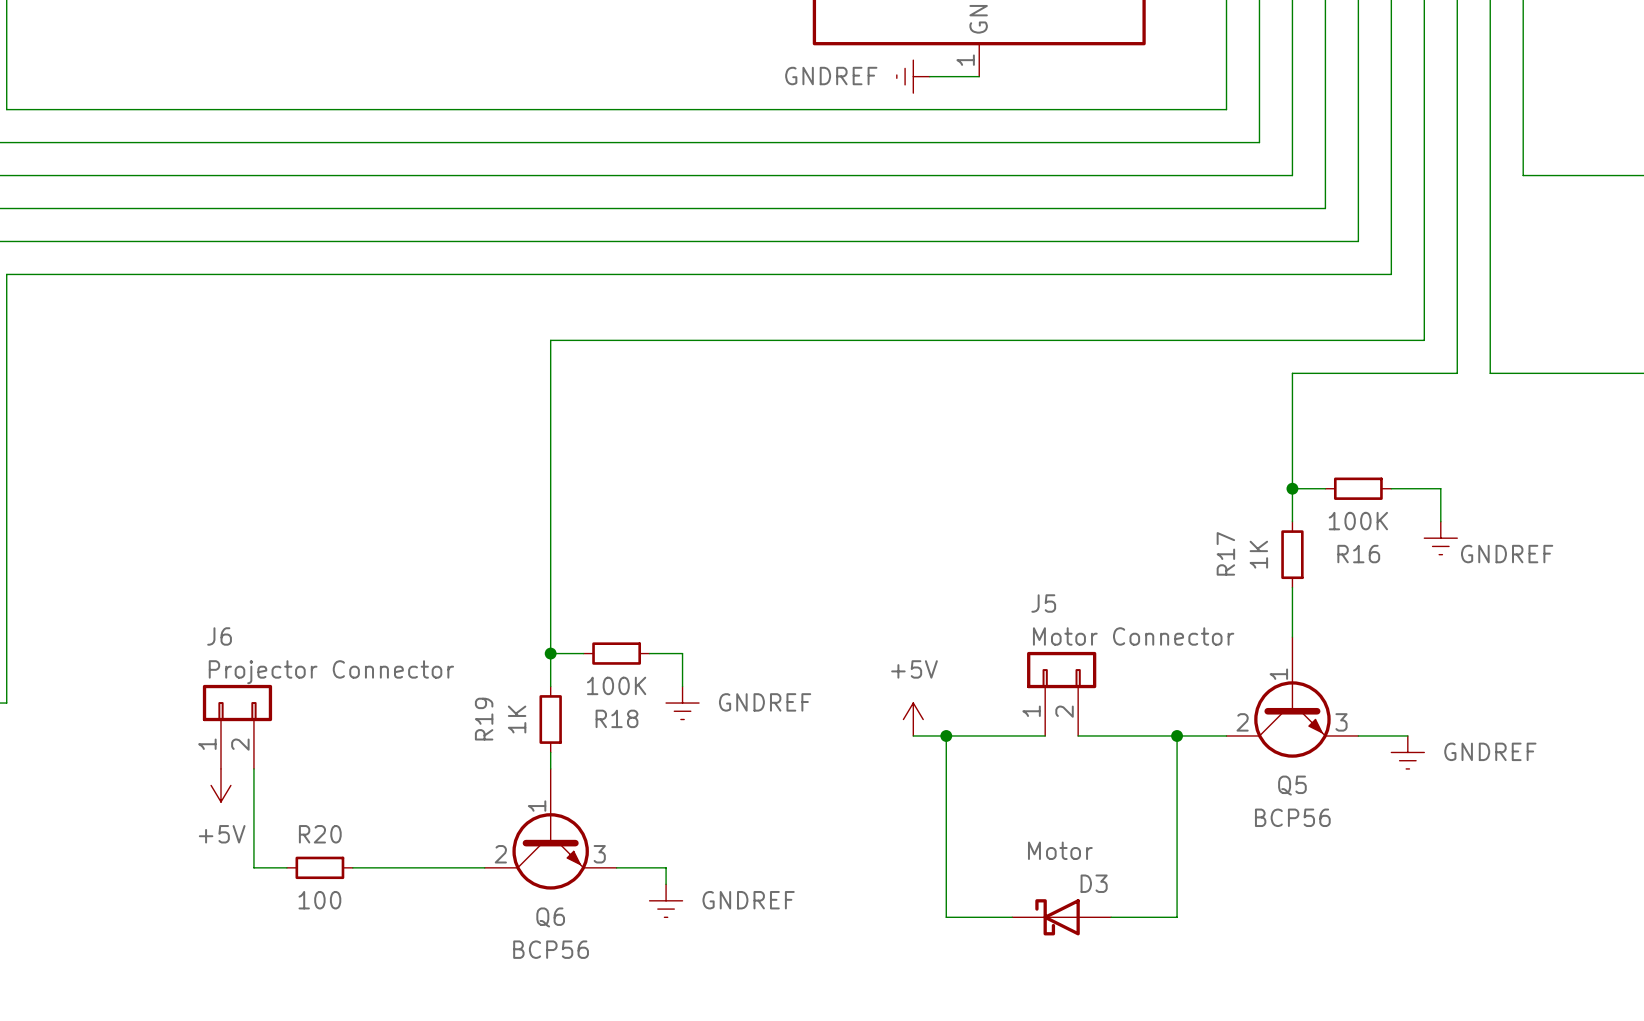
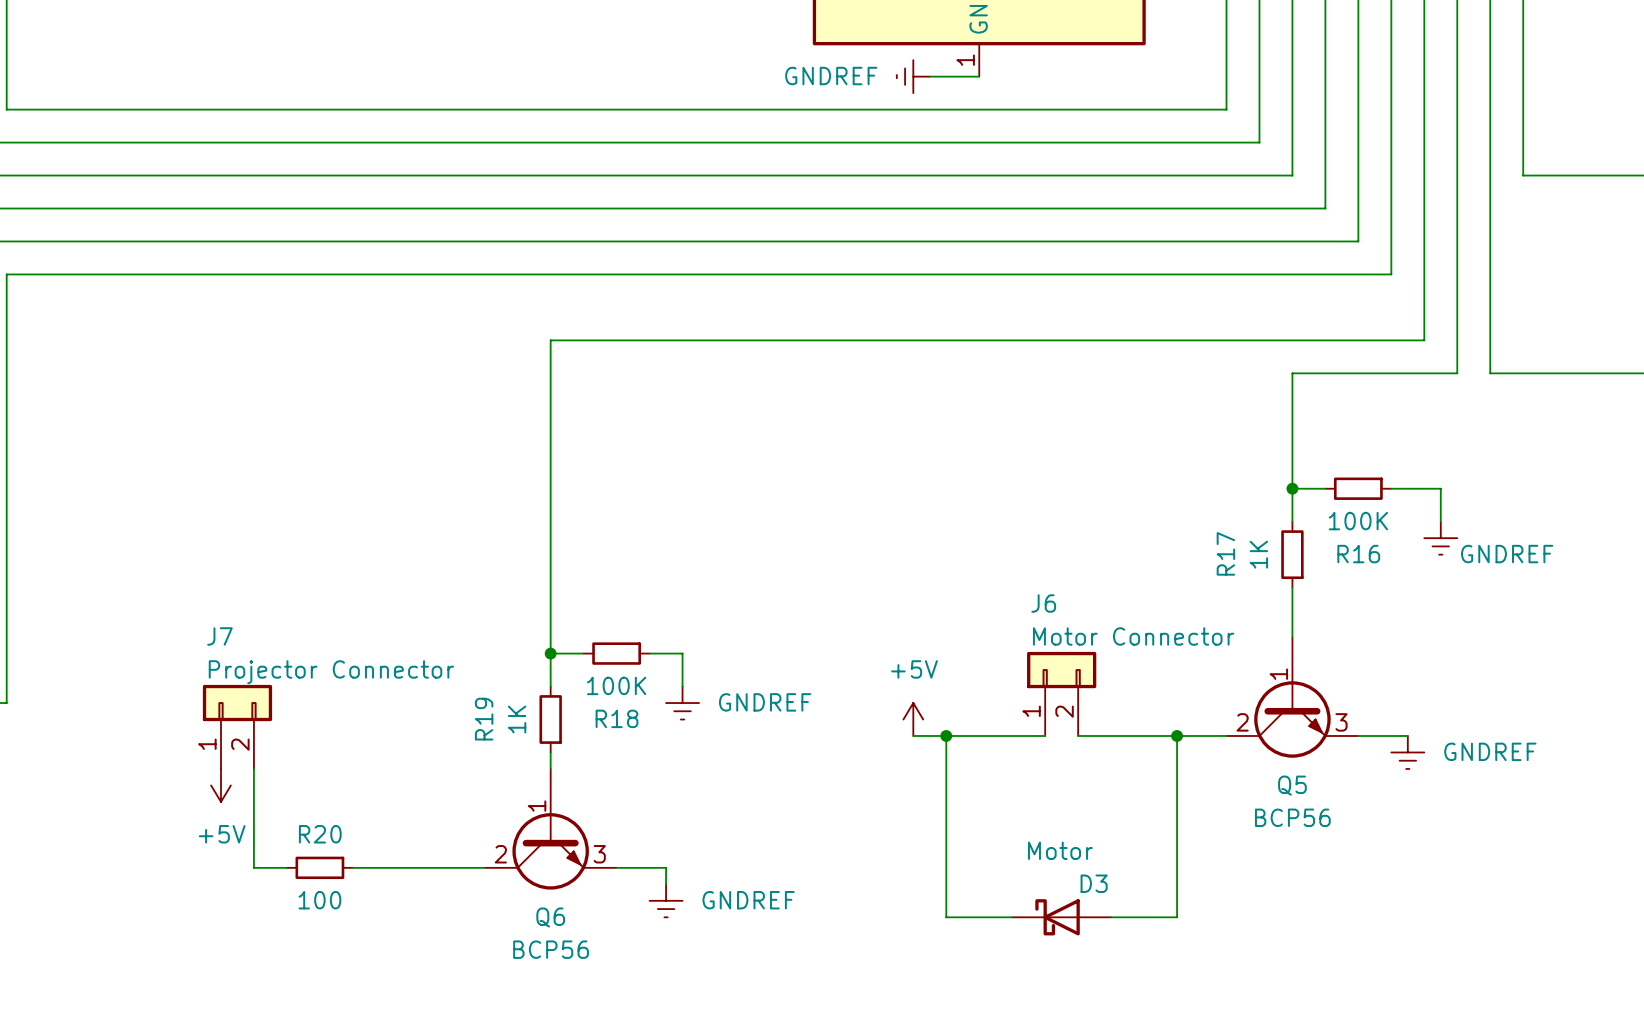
J5 name: J5 (1043, 603) -> J6 (1043, 603)
J6 name: J6 (219, 636) -> J7 (219, 636)

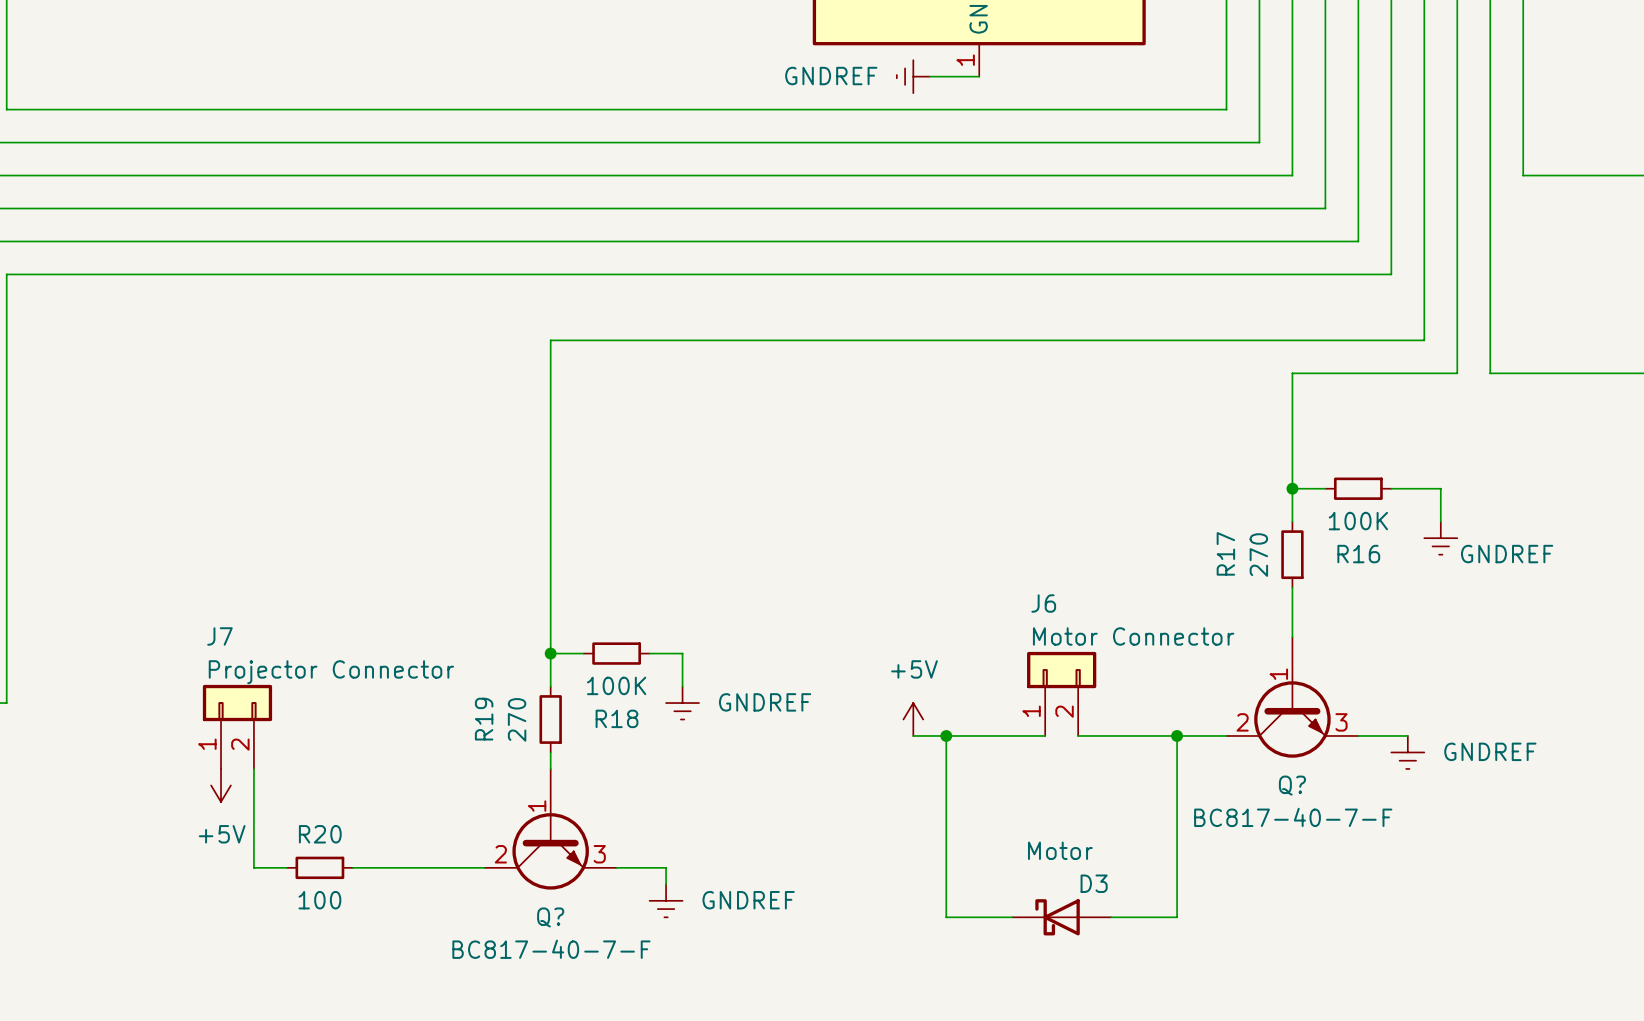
R17 value: 1K (1258, 554) -> 270 (1258, 555)
R19 value: 1K (517, 719) -> 270 (517, 719)
Q5 name: Q5 (1292, 785) -> Q? (1292, 785)
Q5 value: BCP56 (1292, 817) -> BC817-40-7-F (1293, 817)
Q6 name: Q6 (550, 917) -> Q? (550, 917)
Q6 value: BCP56 (551, 949) -> BC817-40-7-F (551, 949)

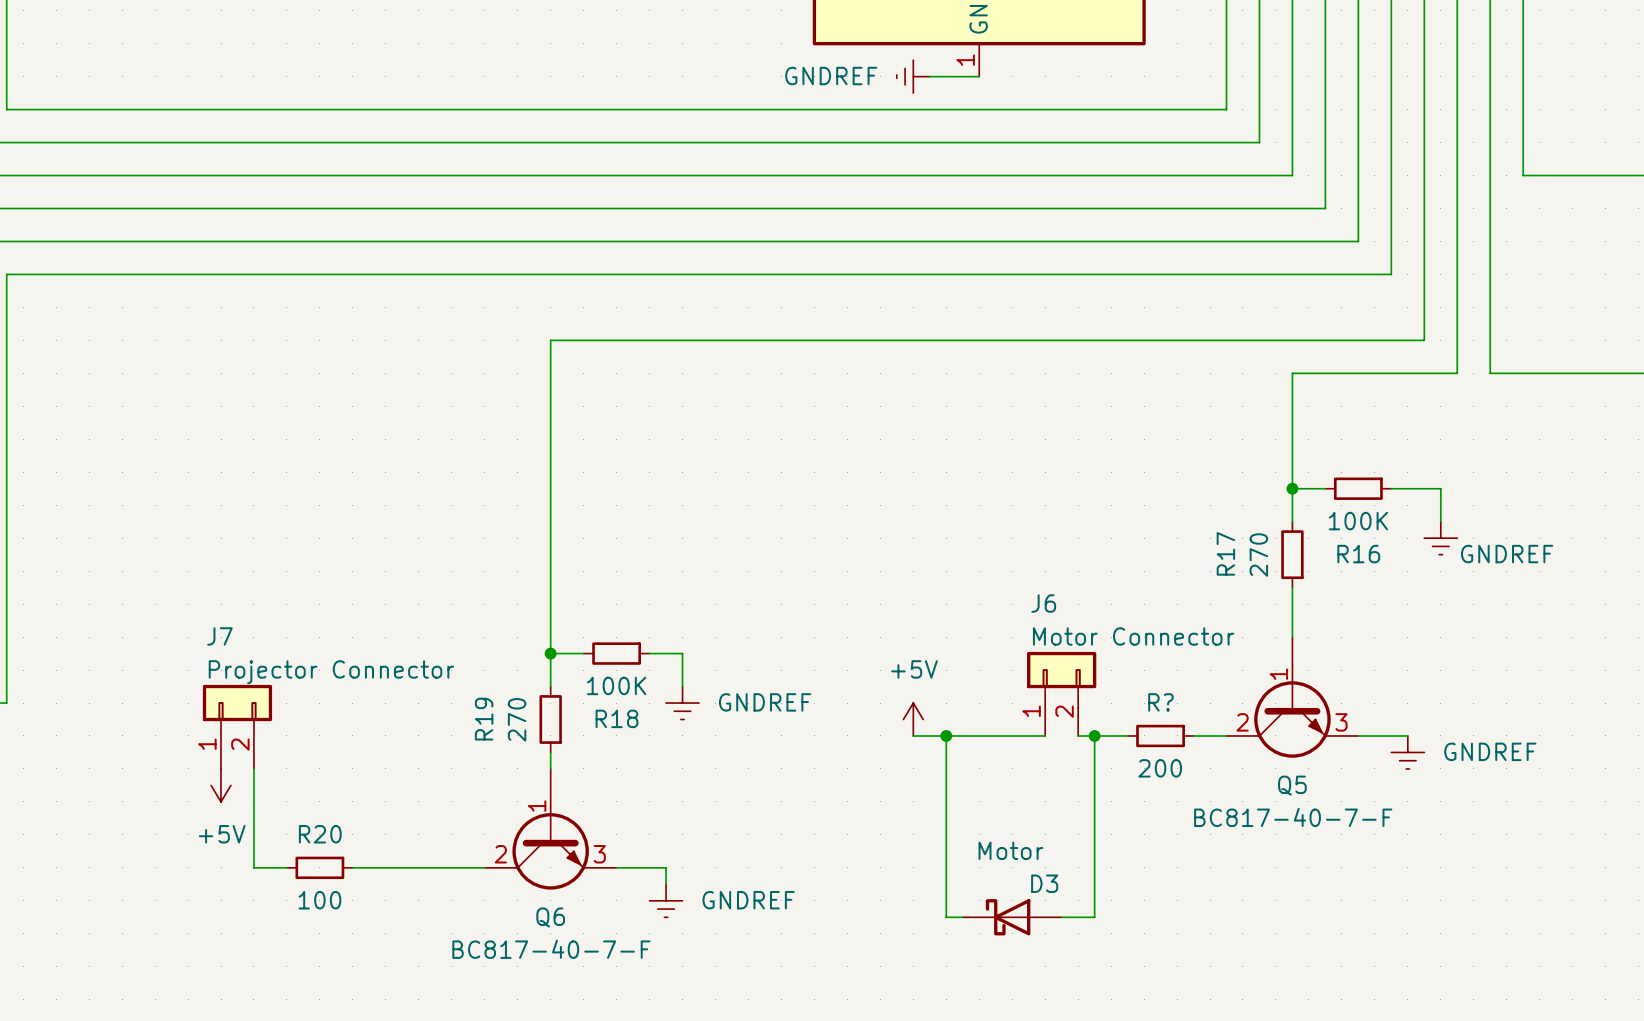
wire: none -> (1094, 735) (1094, 917) (1061, 917)
junction: none -> (1094, 735)
wire: (1127, 735) (1193, 735) -> none
R?: none -> 200 (1160, 735)
wire: (1177, 735) (1177, 917) (1111, 917) -> none
junction: (1177, 735) -> none
Q? name: Q? (1292, 785) -> Q5 (1292, 785)
Q? name: Q? (550, 917) -> Q6 (550, 917)
D3 position: (1061, 917) -> (1012, 917)

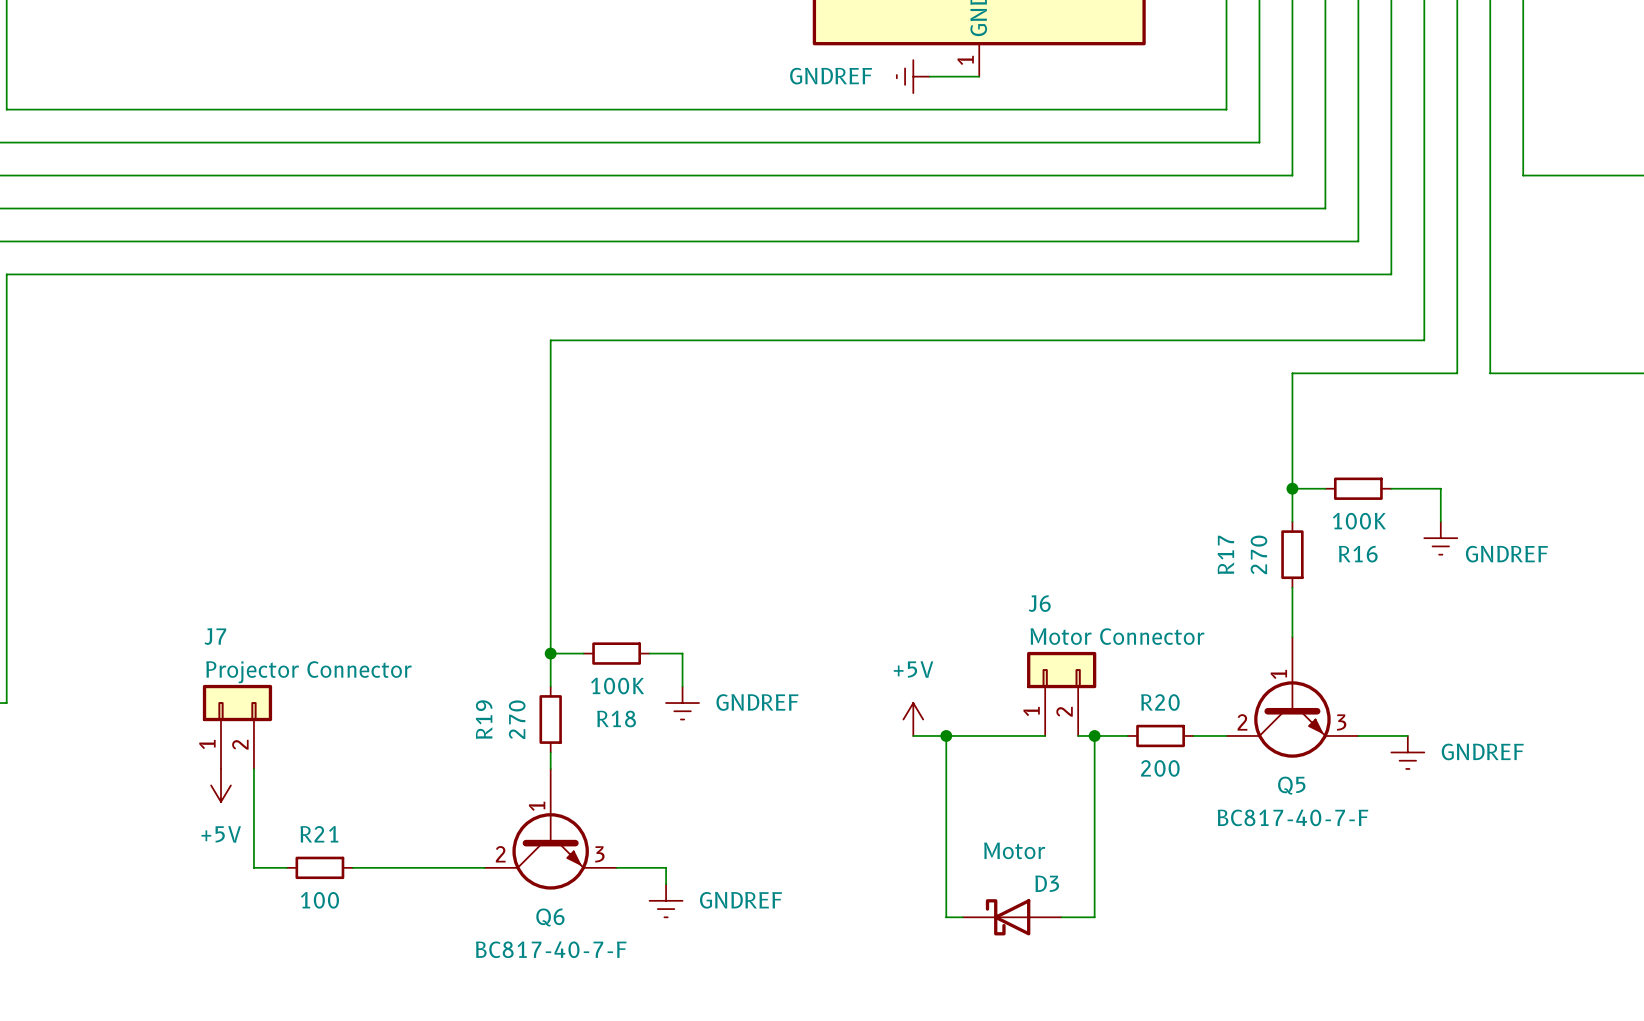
R? name: R? (1160, 702) -> R20 (1160, 702)
R20 name: R20 (320, 834) -> R21 (319, 834)

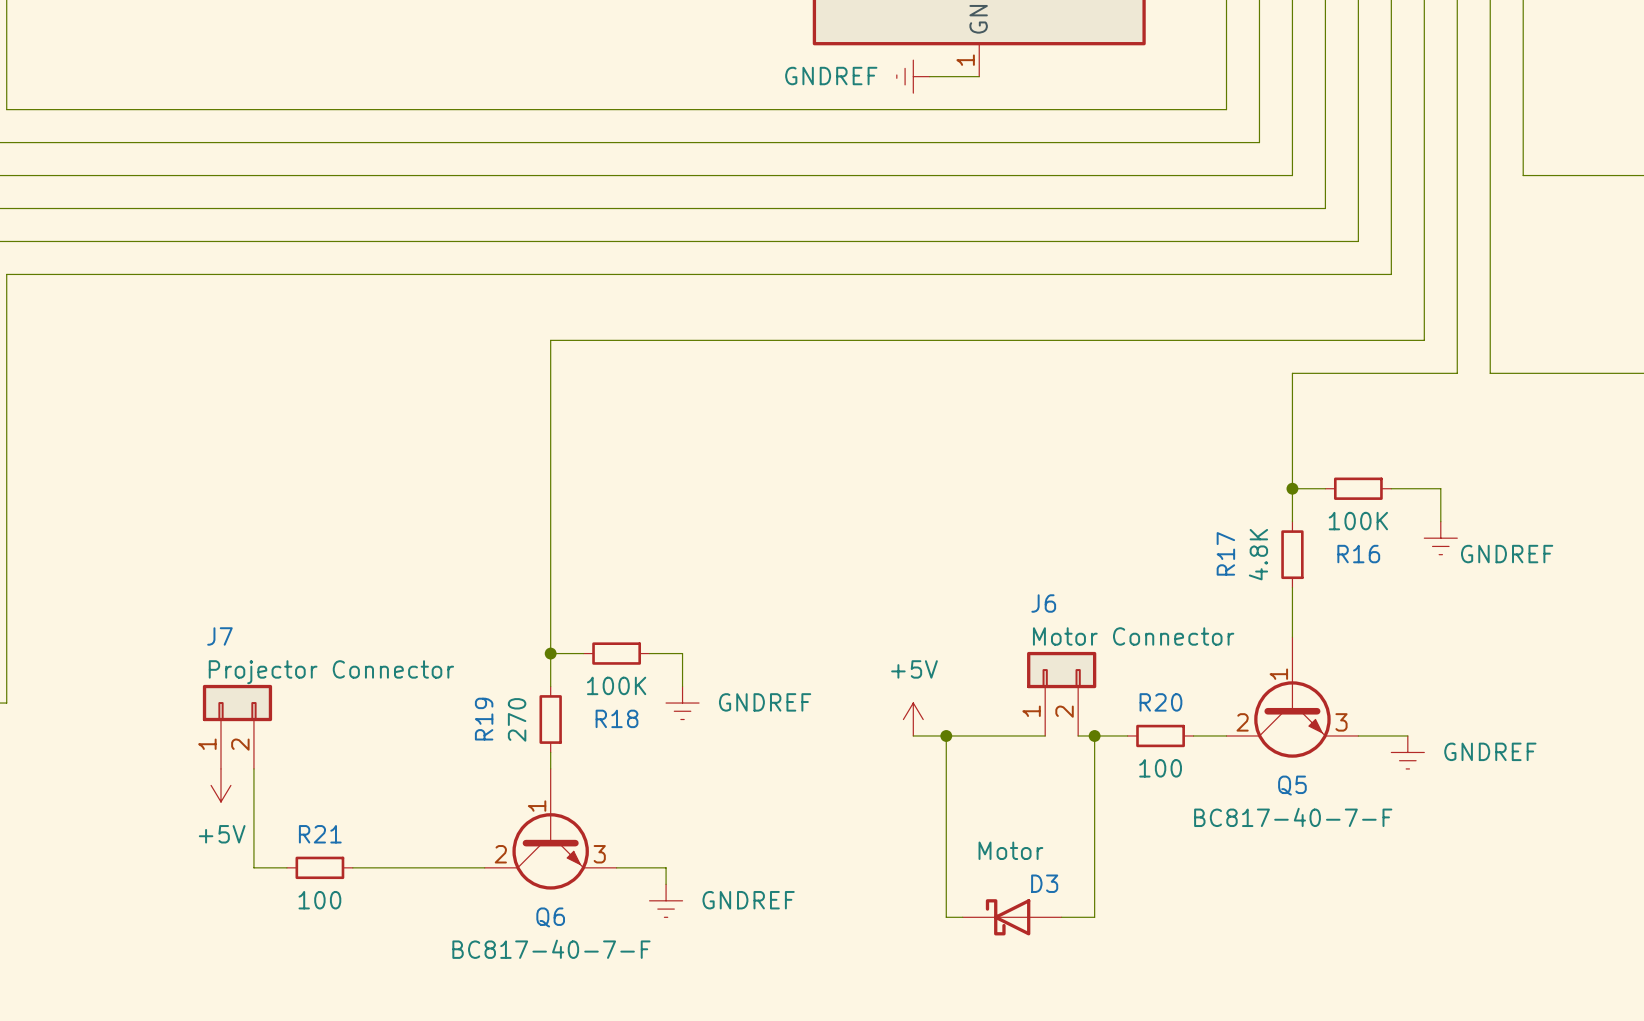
R17 value: 270 (1258, 554) -> 4.8K (1258, 554)
R20 value: 200 (1160, 768) -> 100 (1160, 768)

